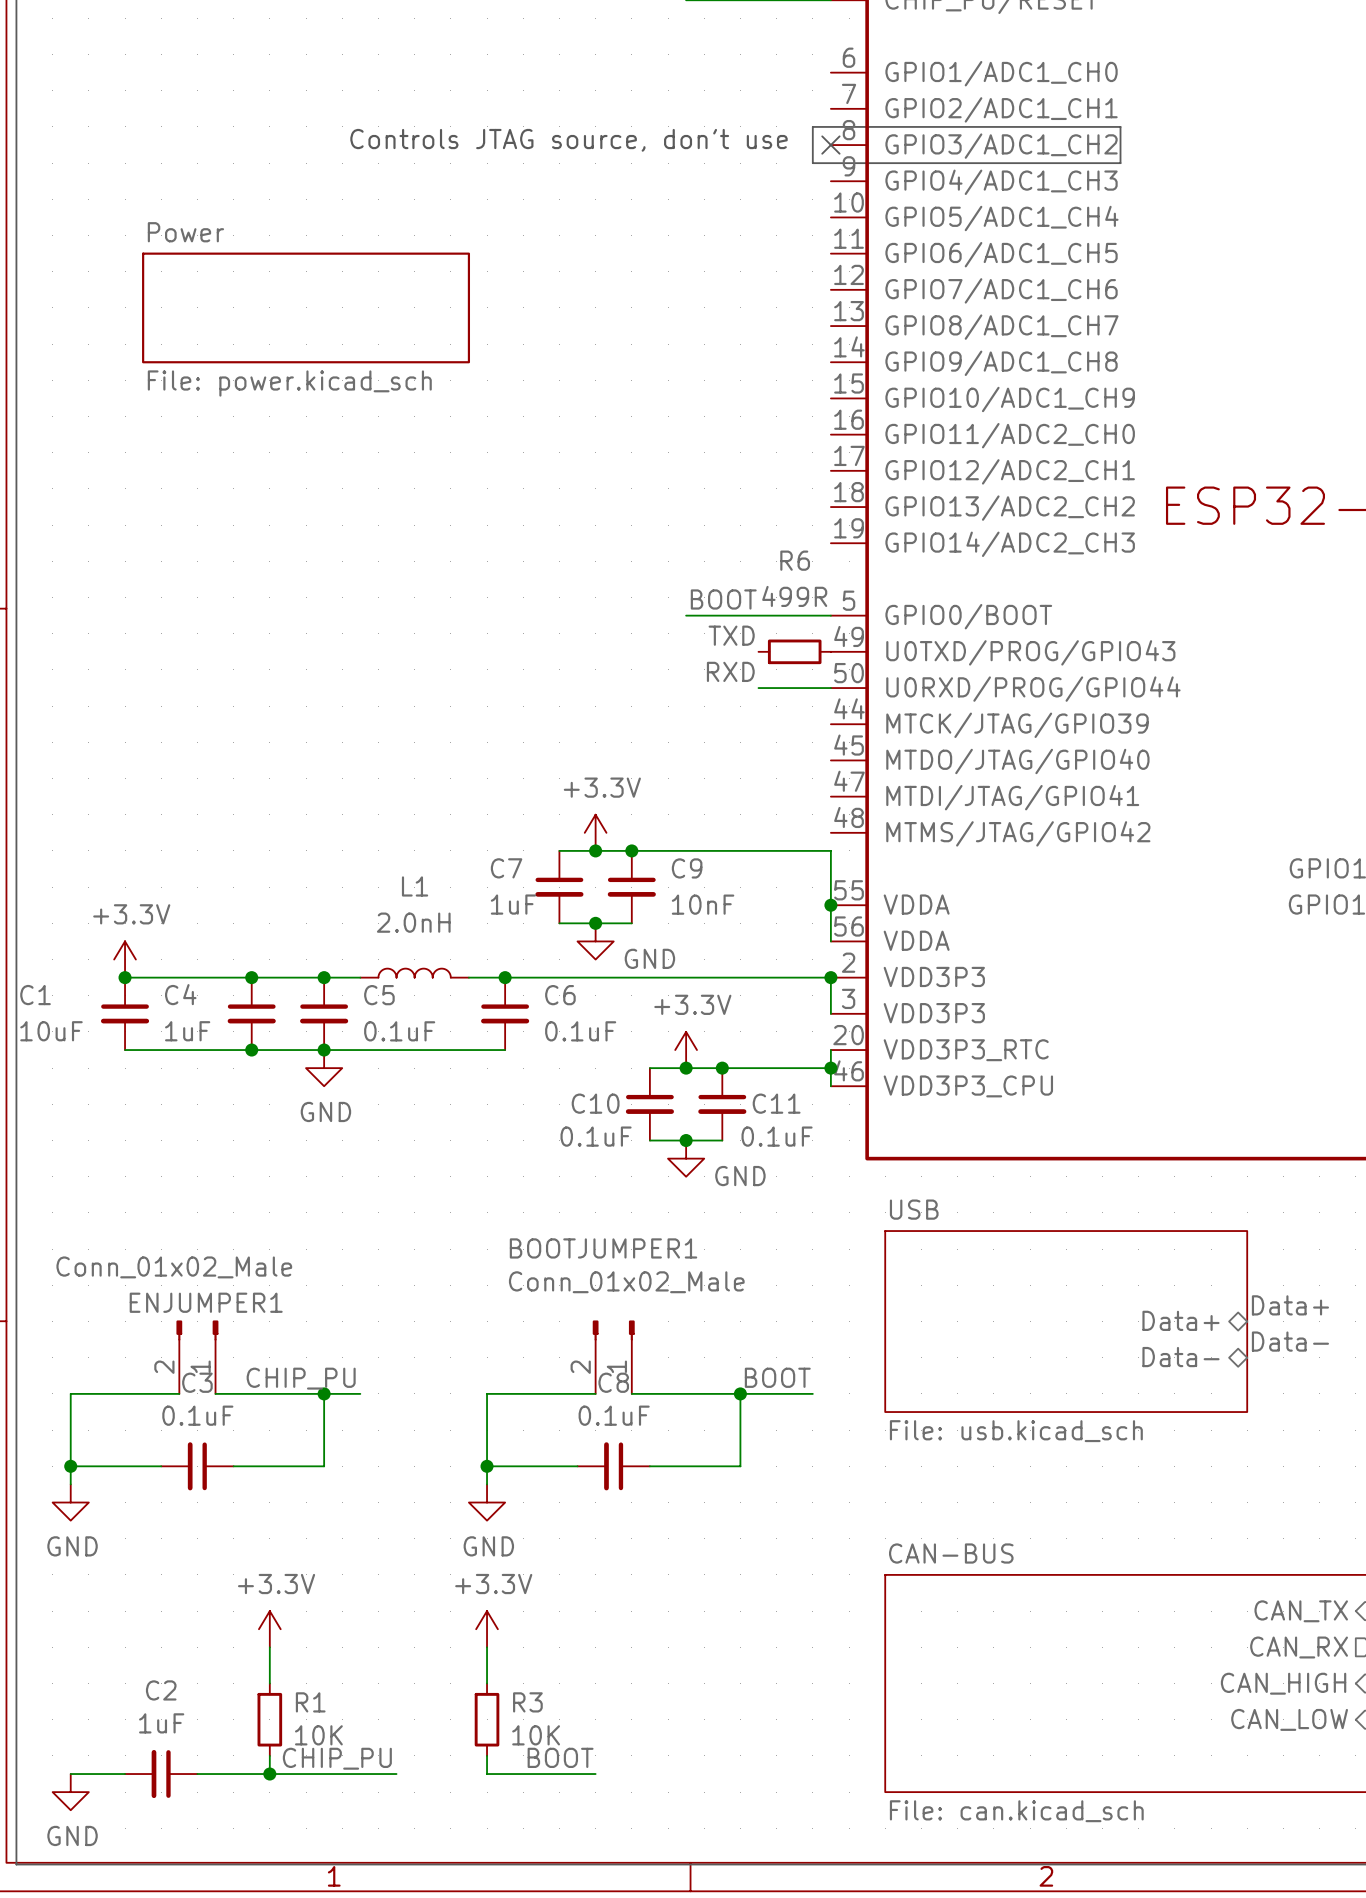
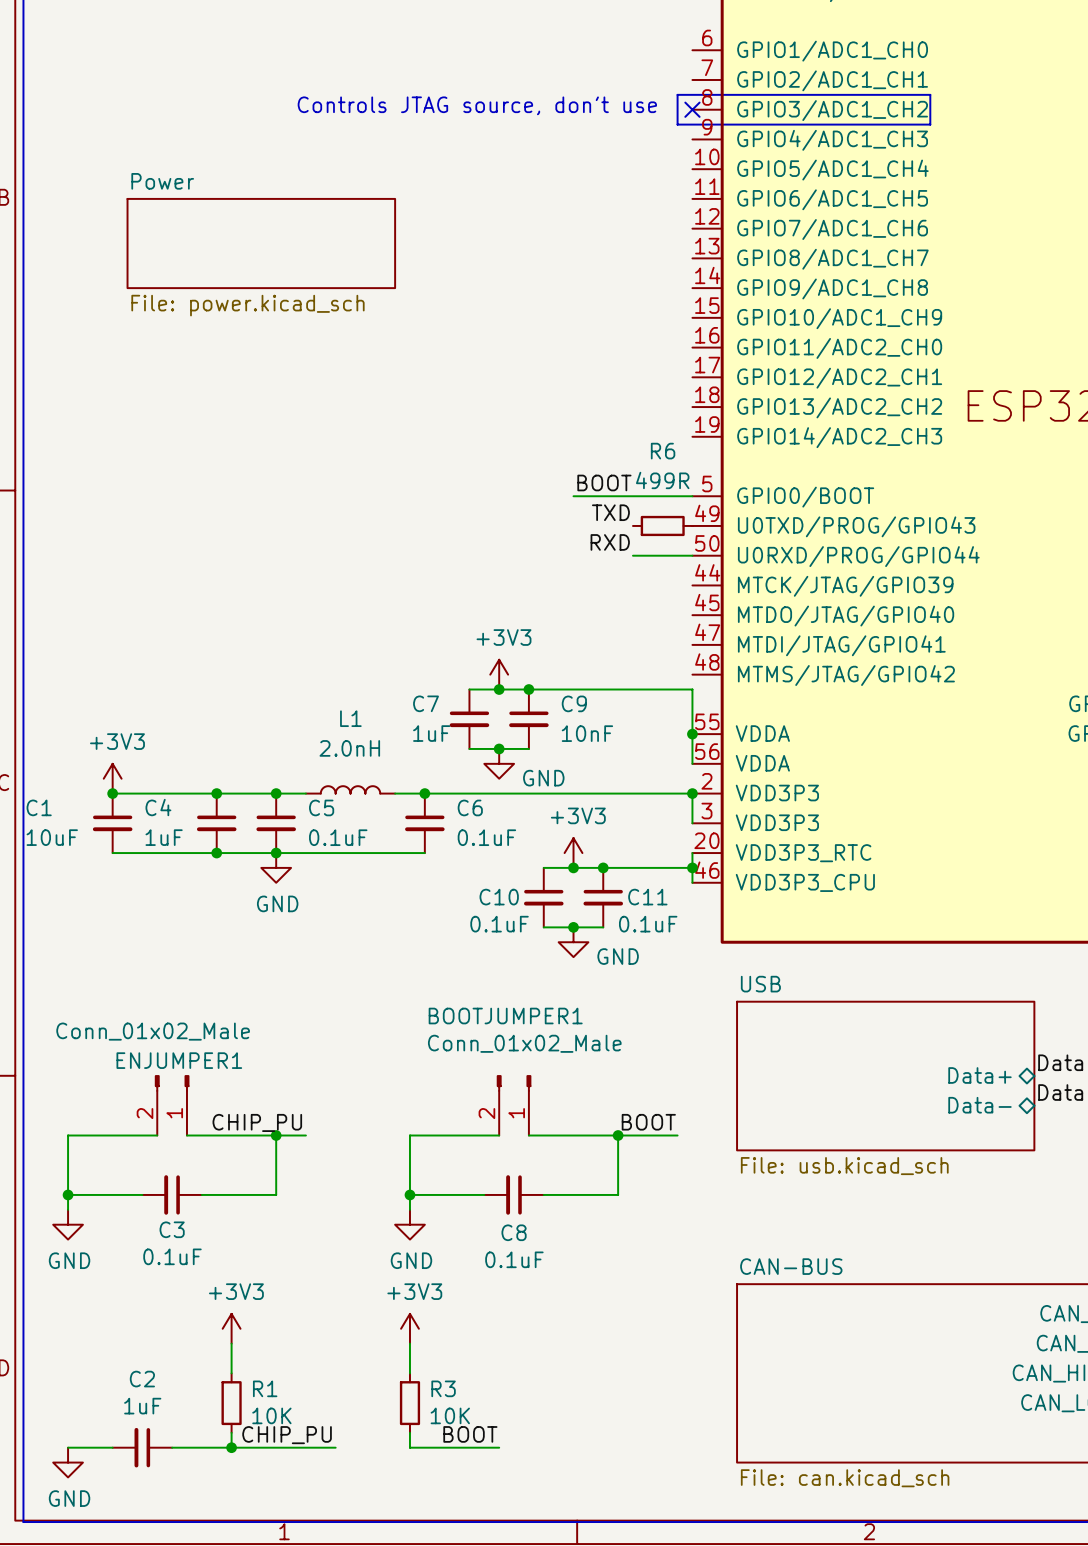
power symbol: +3.3V (595, 832) -> +3V3 (499, 674)
power symbol: +3.3V (125, 959) -> +3V3 (112, 778)
power symbol: +3.3V (686, 1050) -> +3V3 (573, 853)
C3 name position: C3 (197, 1382) -> C3 (172, 1229)
C8 name position: C8 (613, 1382) -> C8 (514, 1232)
C3 value position: 0.1uF (197, 1415) -> 0.1uF (172, 1256)
C8 value position: 0.1uF (614, 1415) -> 0.1uF (514, 1259)
power symbol: +3.3V (269, 1629) -> +3V3 (231, 1328)
power symbol: +3.3V (487, 1629) -> +3V3 (409, 1328)

